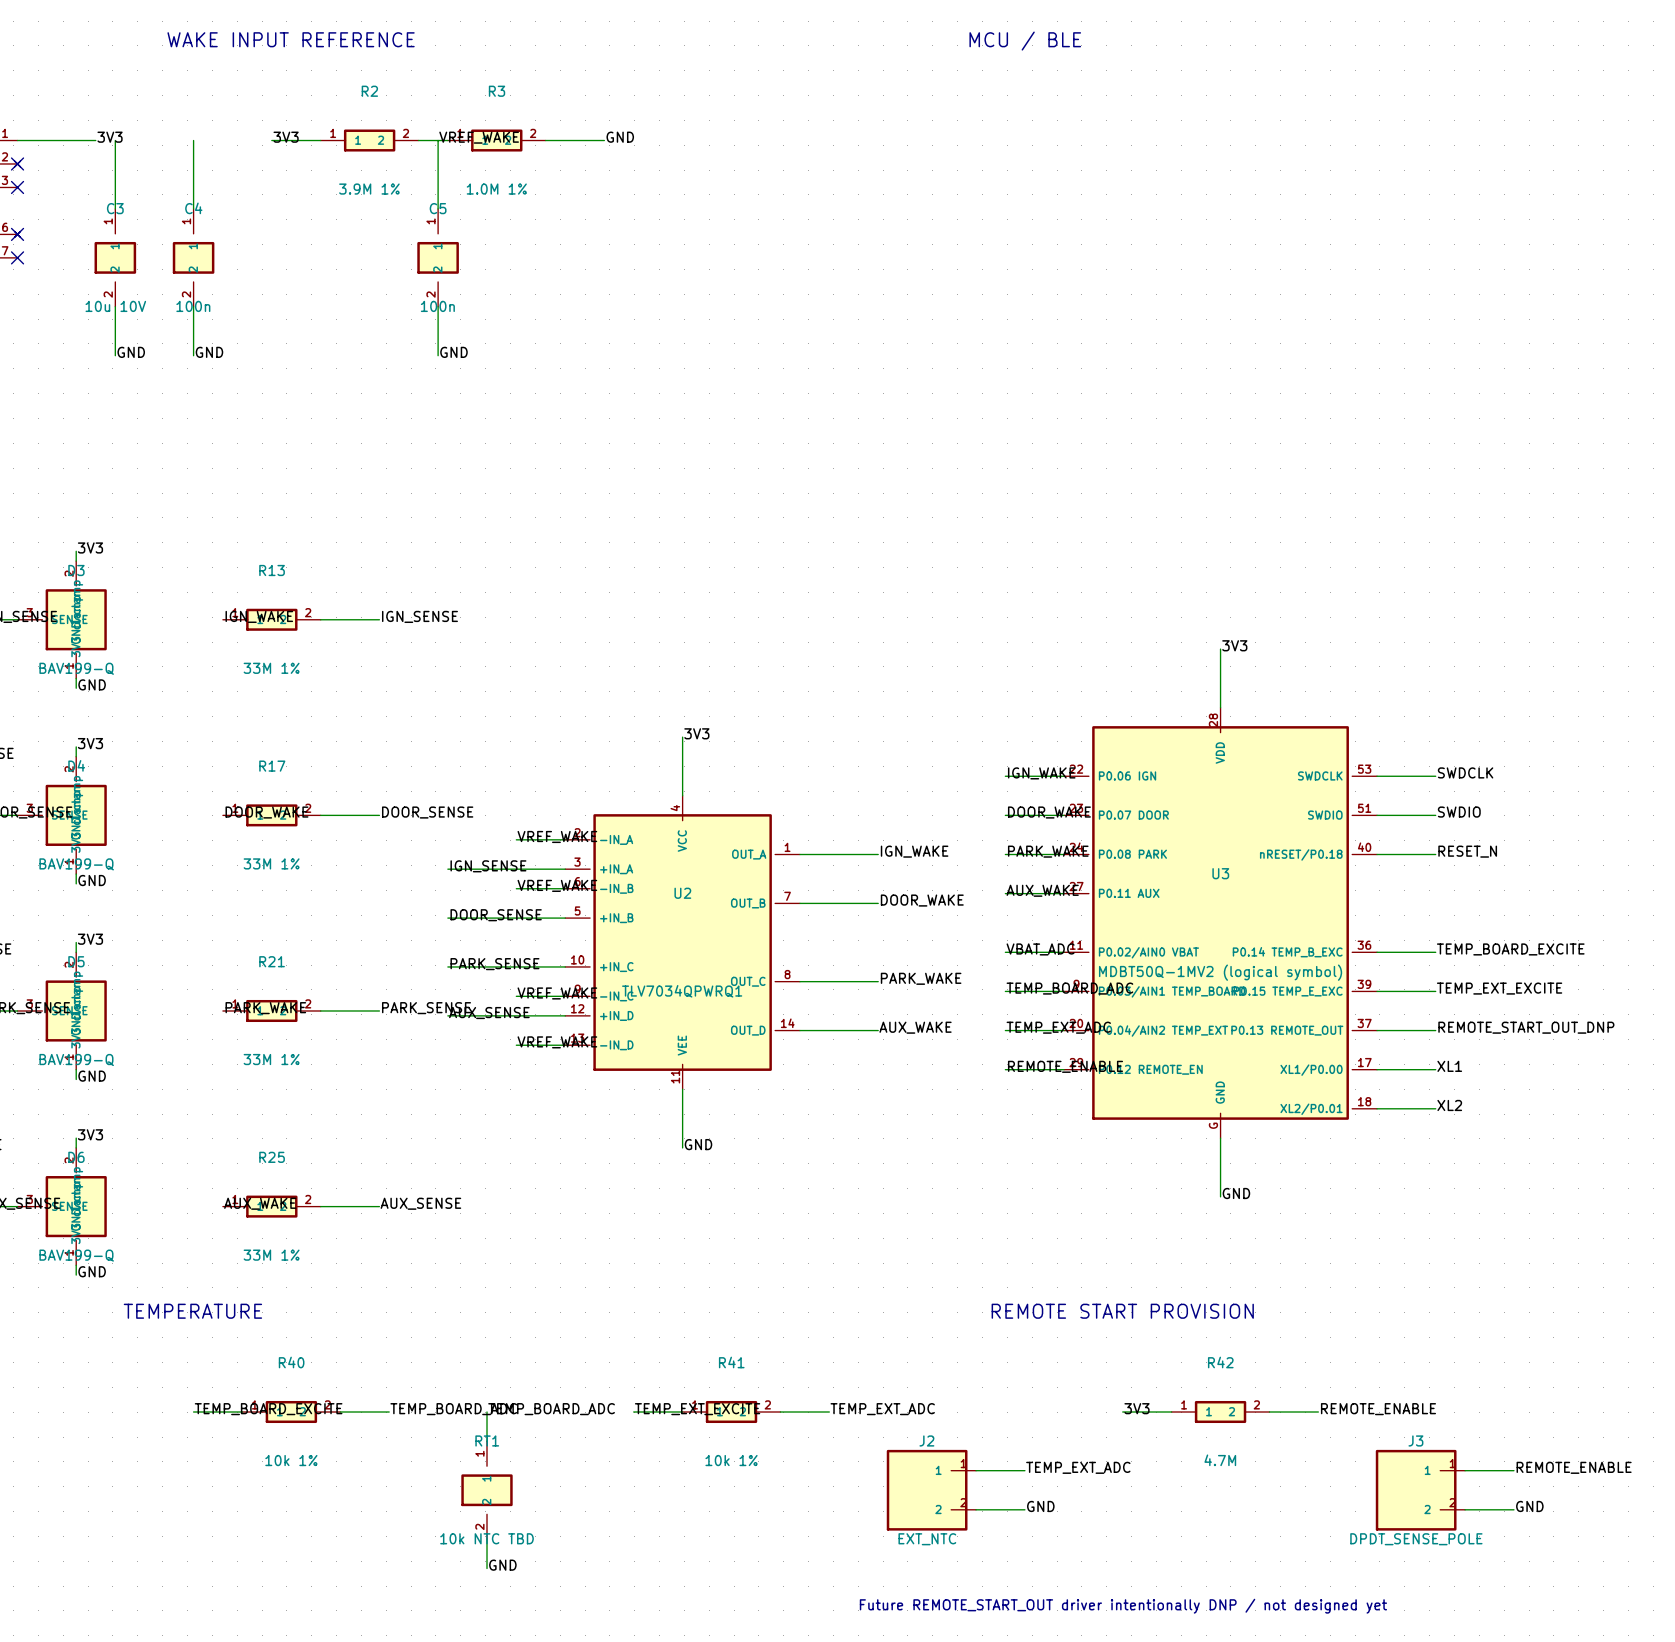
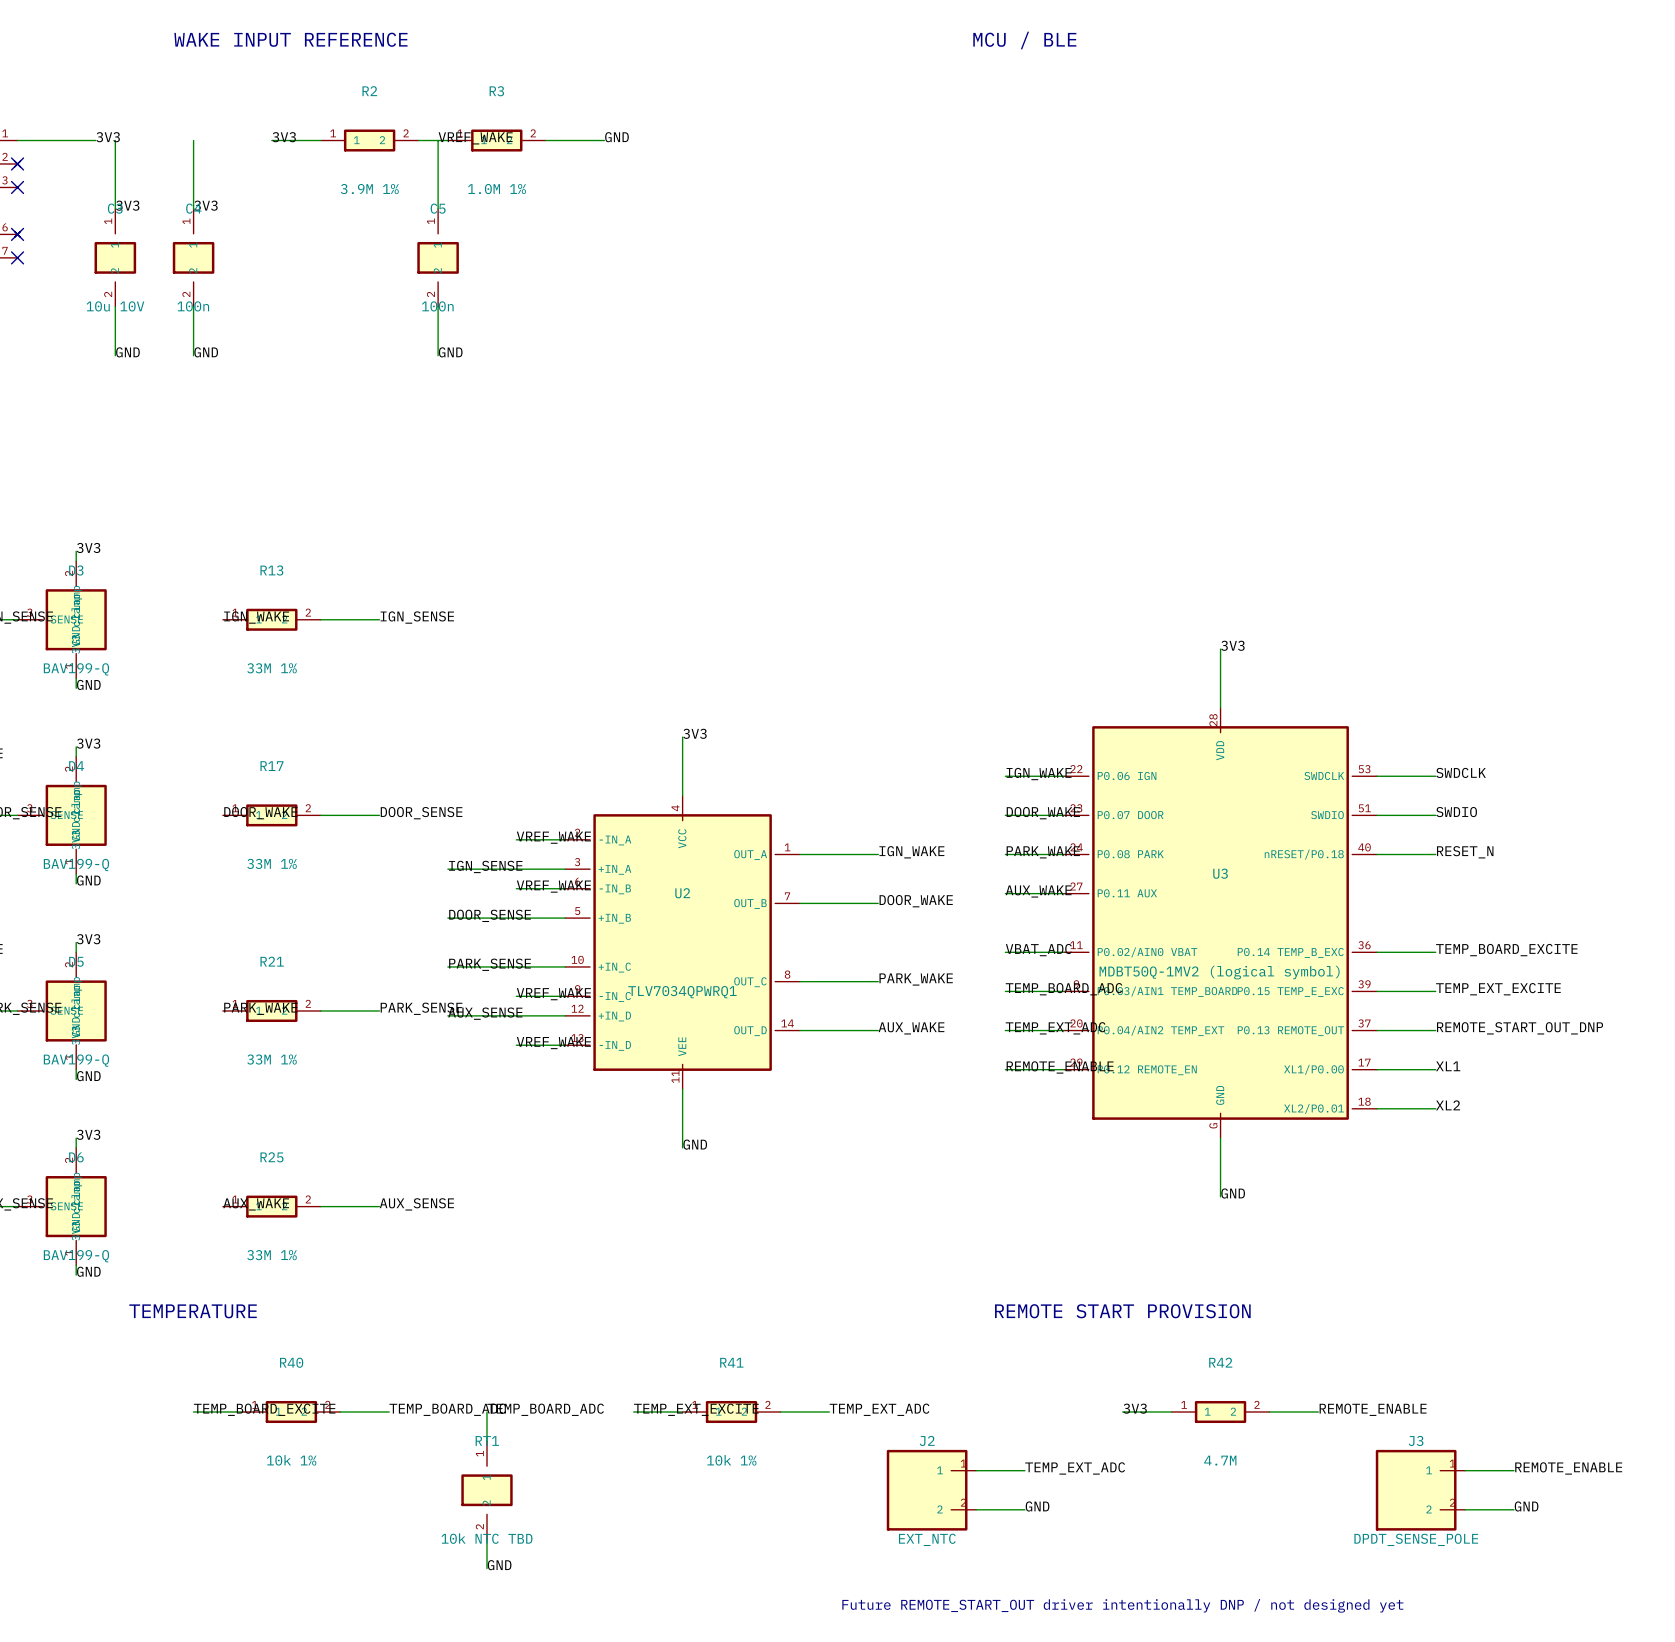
label: none -> 3V3 (127, 205)
label: none -> 3V3 (205, 205)

